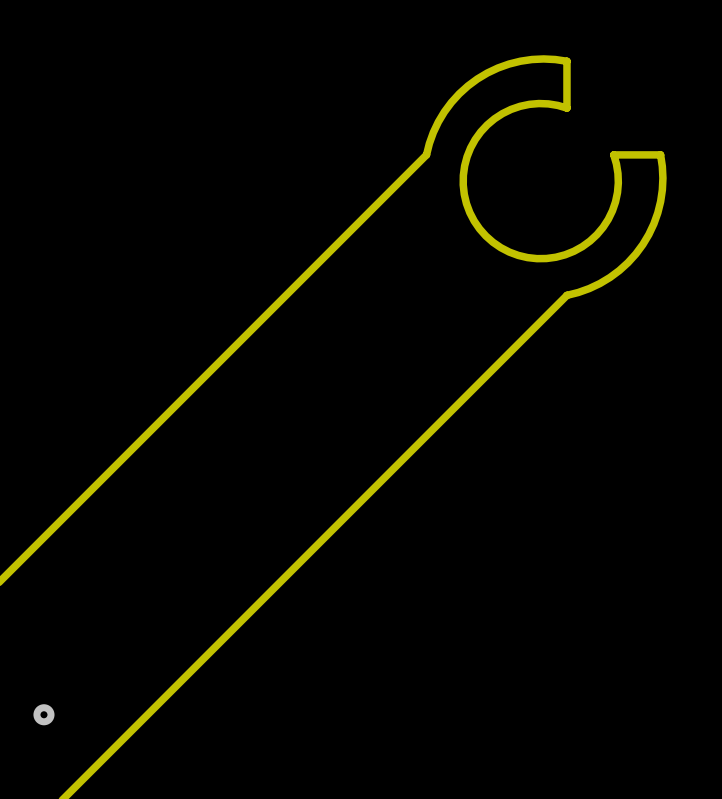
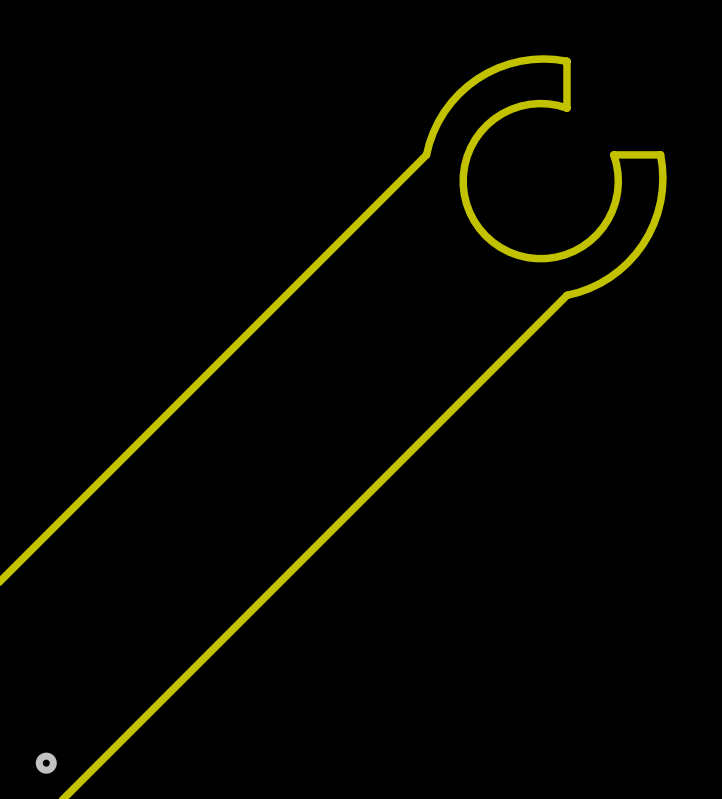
via position: (43, 714) -> (46, 763)

